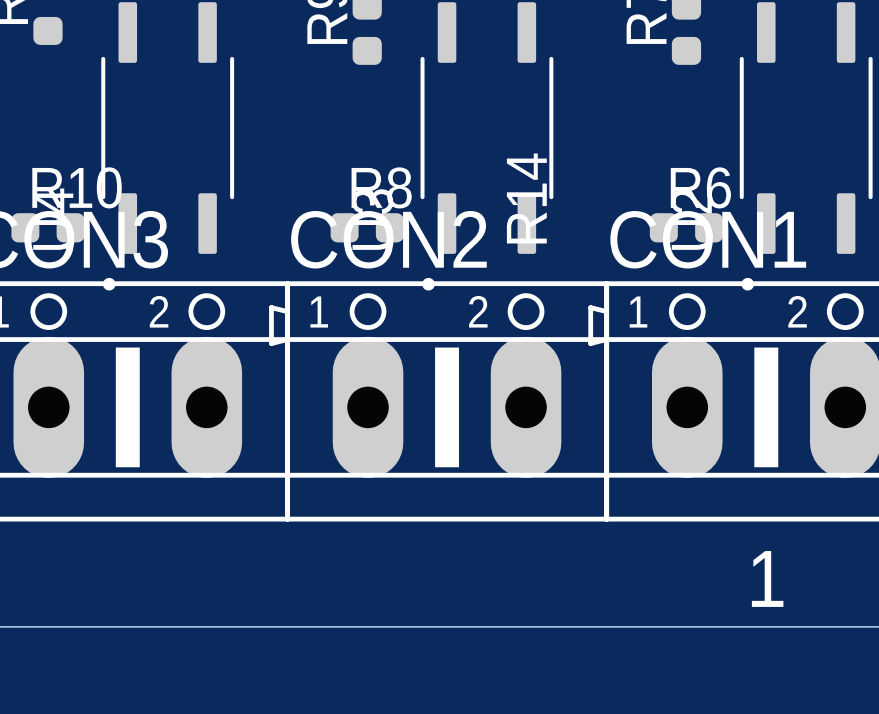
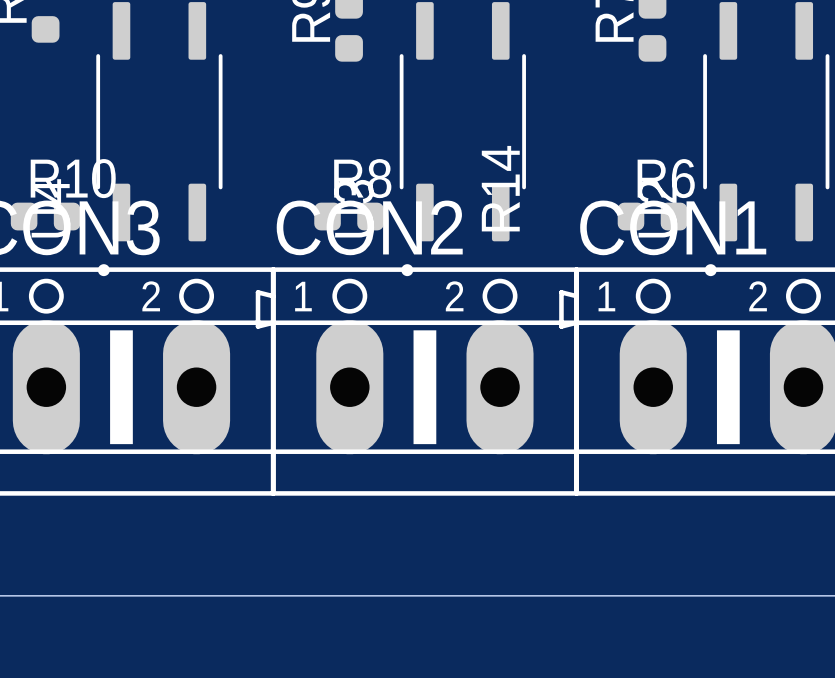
text: 1 (767, 578) -> none

